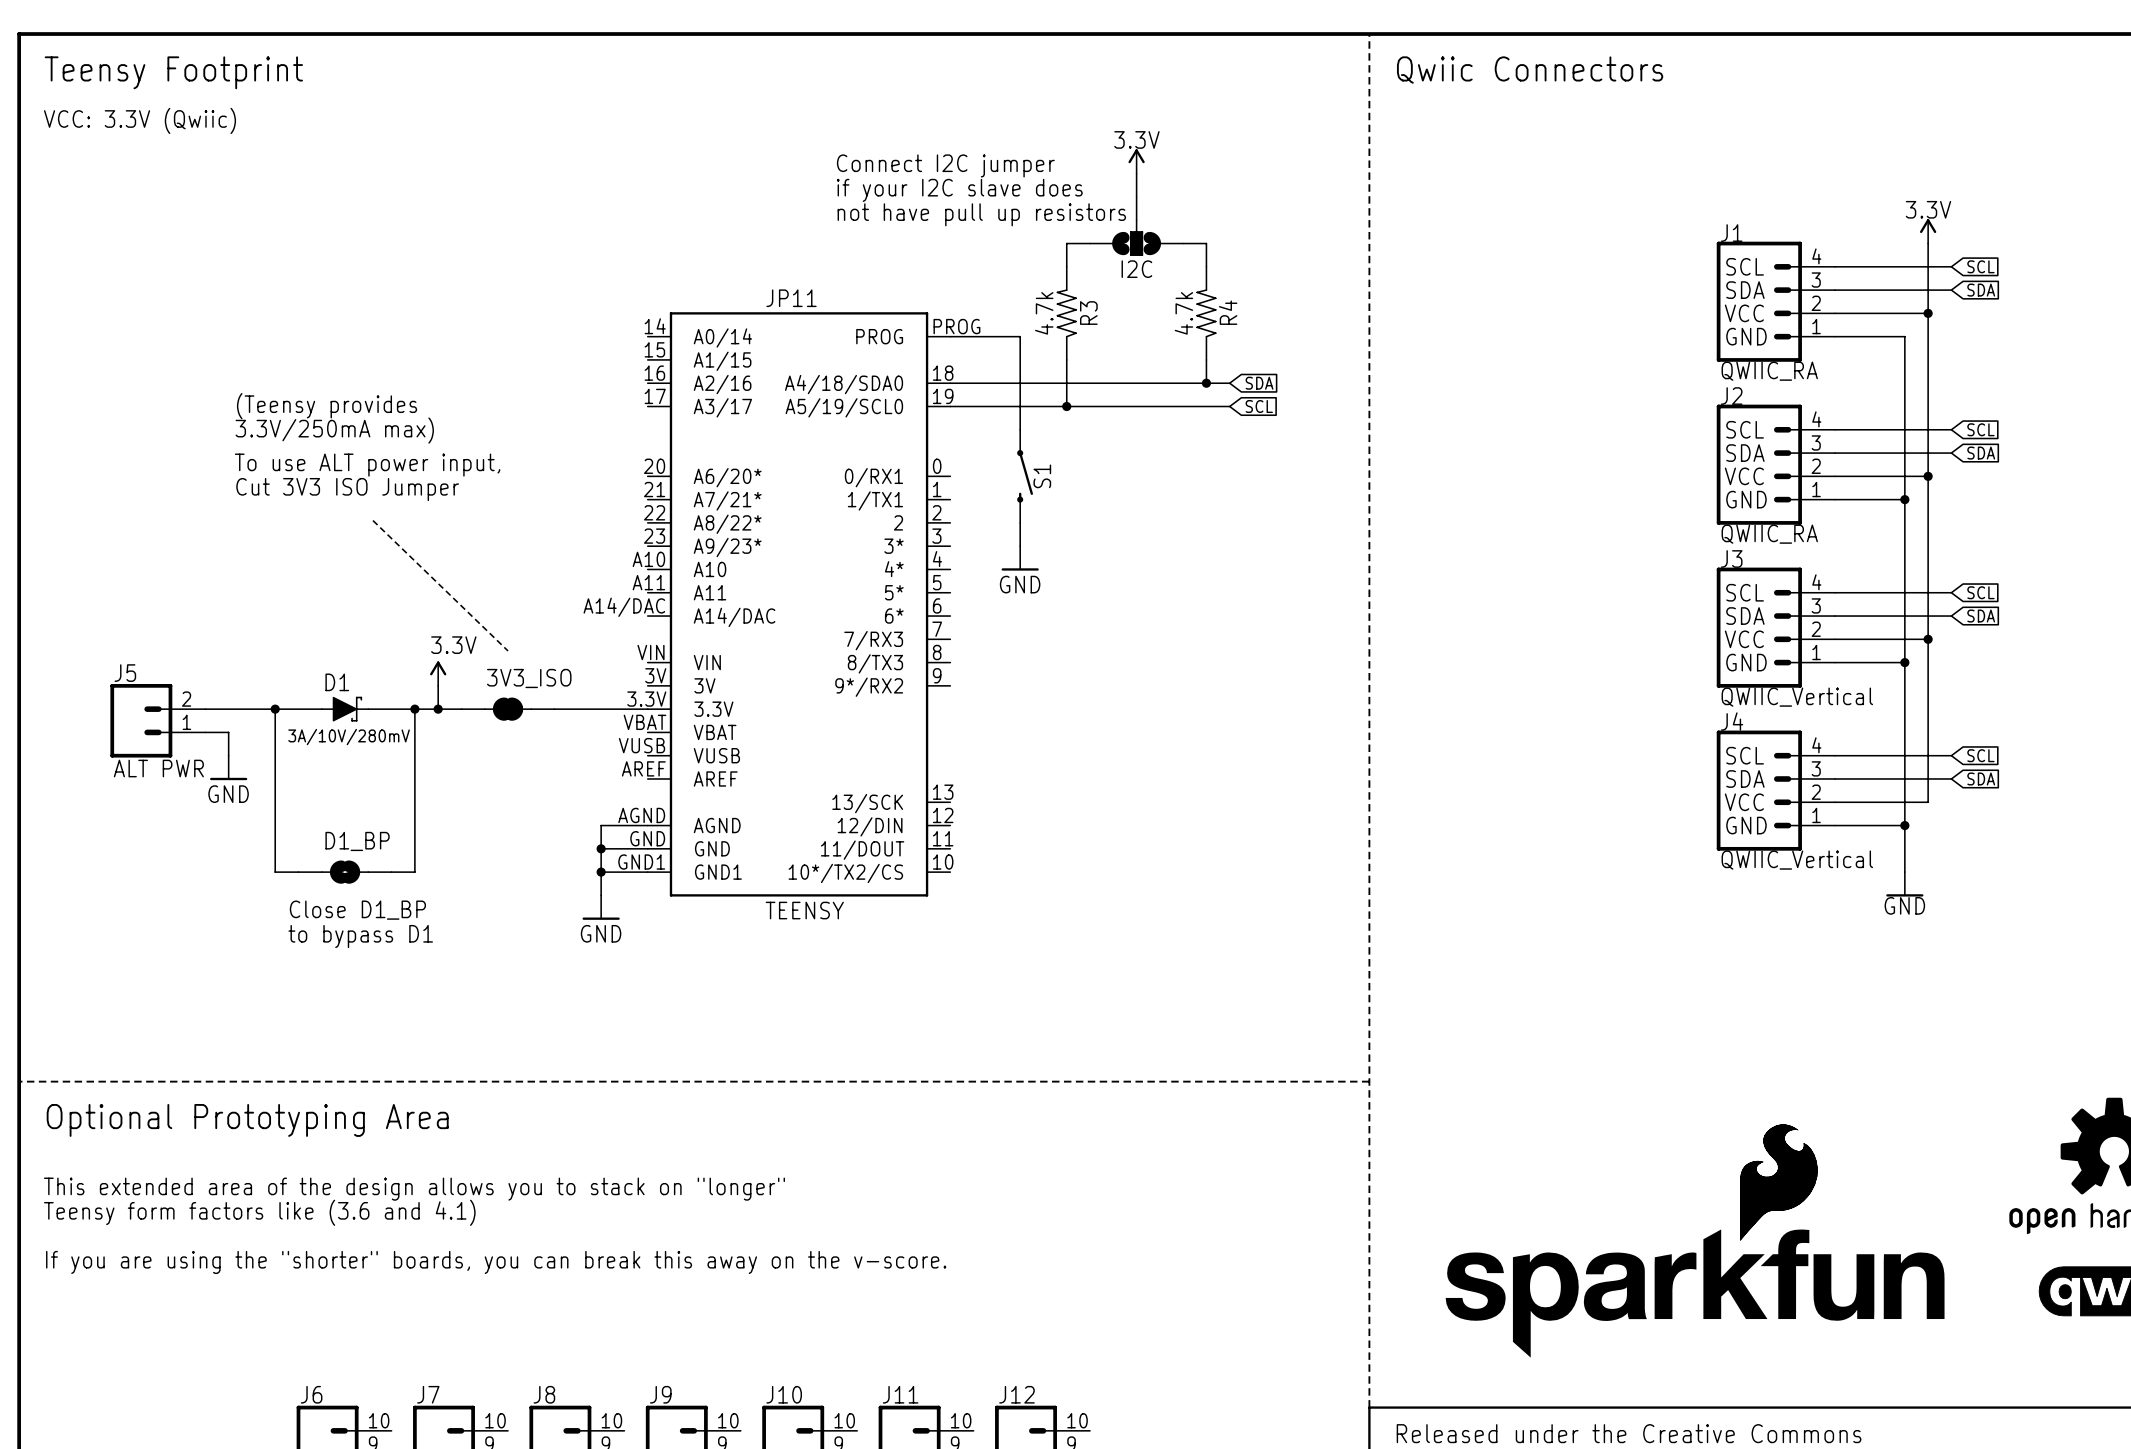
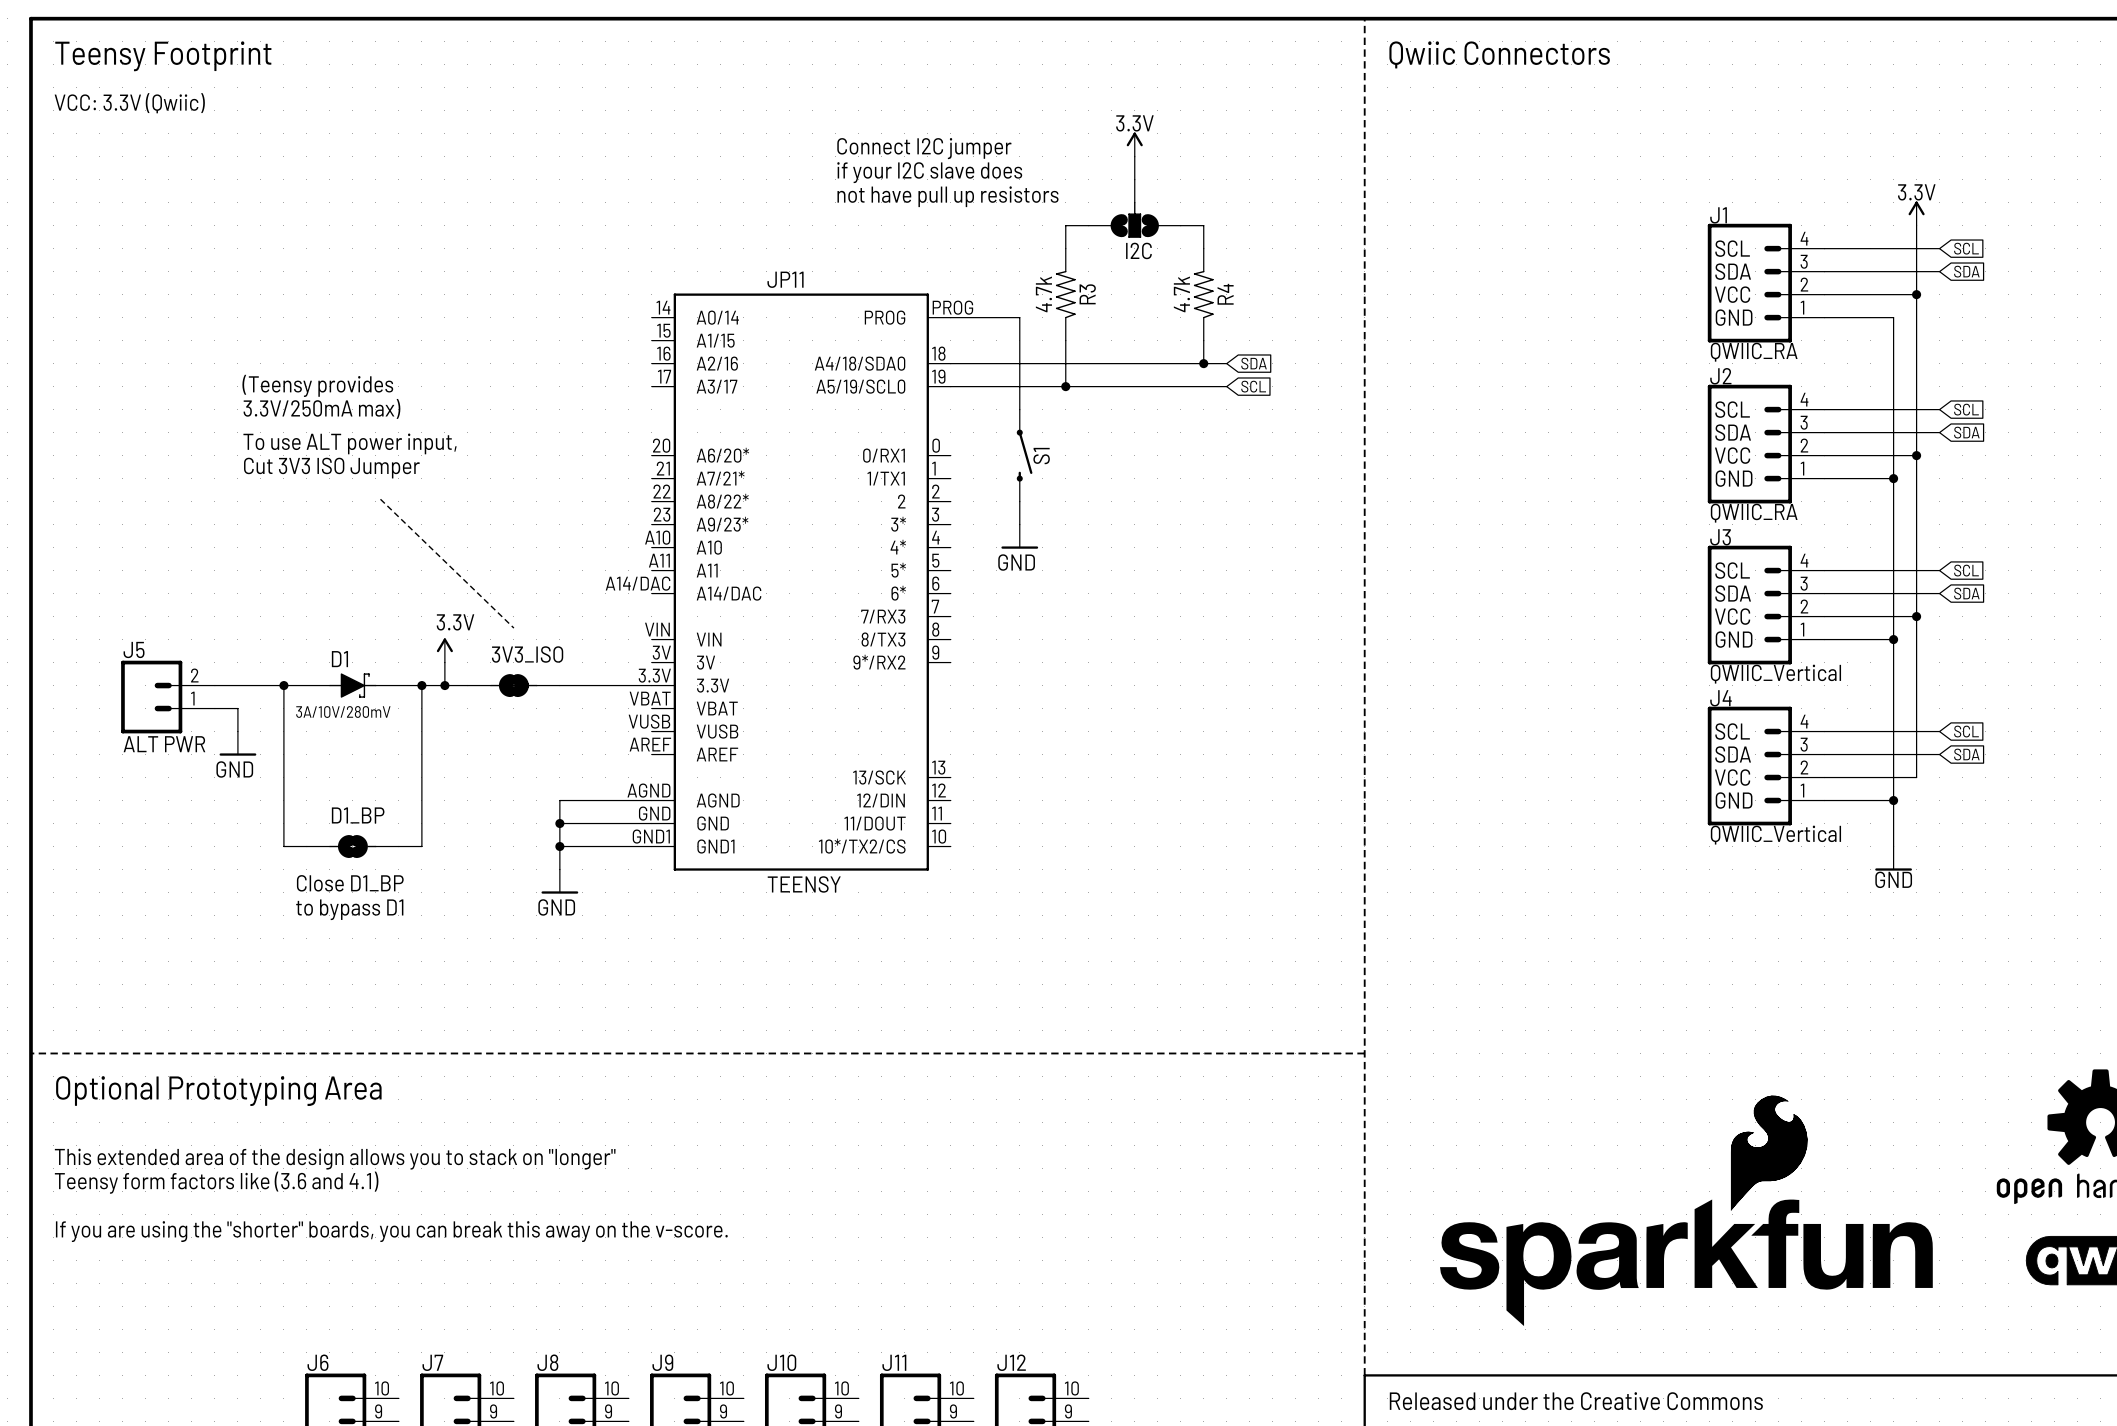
wire: (601, 825) (601, 895) -> (605, 800) (559, 800) (559, 869)
wire: none -> (559, 823) (605, 823)
junction: none -> (559, 823)
junction: (601, 848) -> none
wire: none -> (559, 846) (605, 846)
junction: none -> (559, 846)
junction: (601, 872) -> none
power symbol position: GND (601, 907) -> GND (559, 881)

